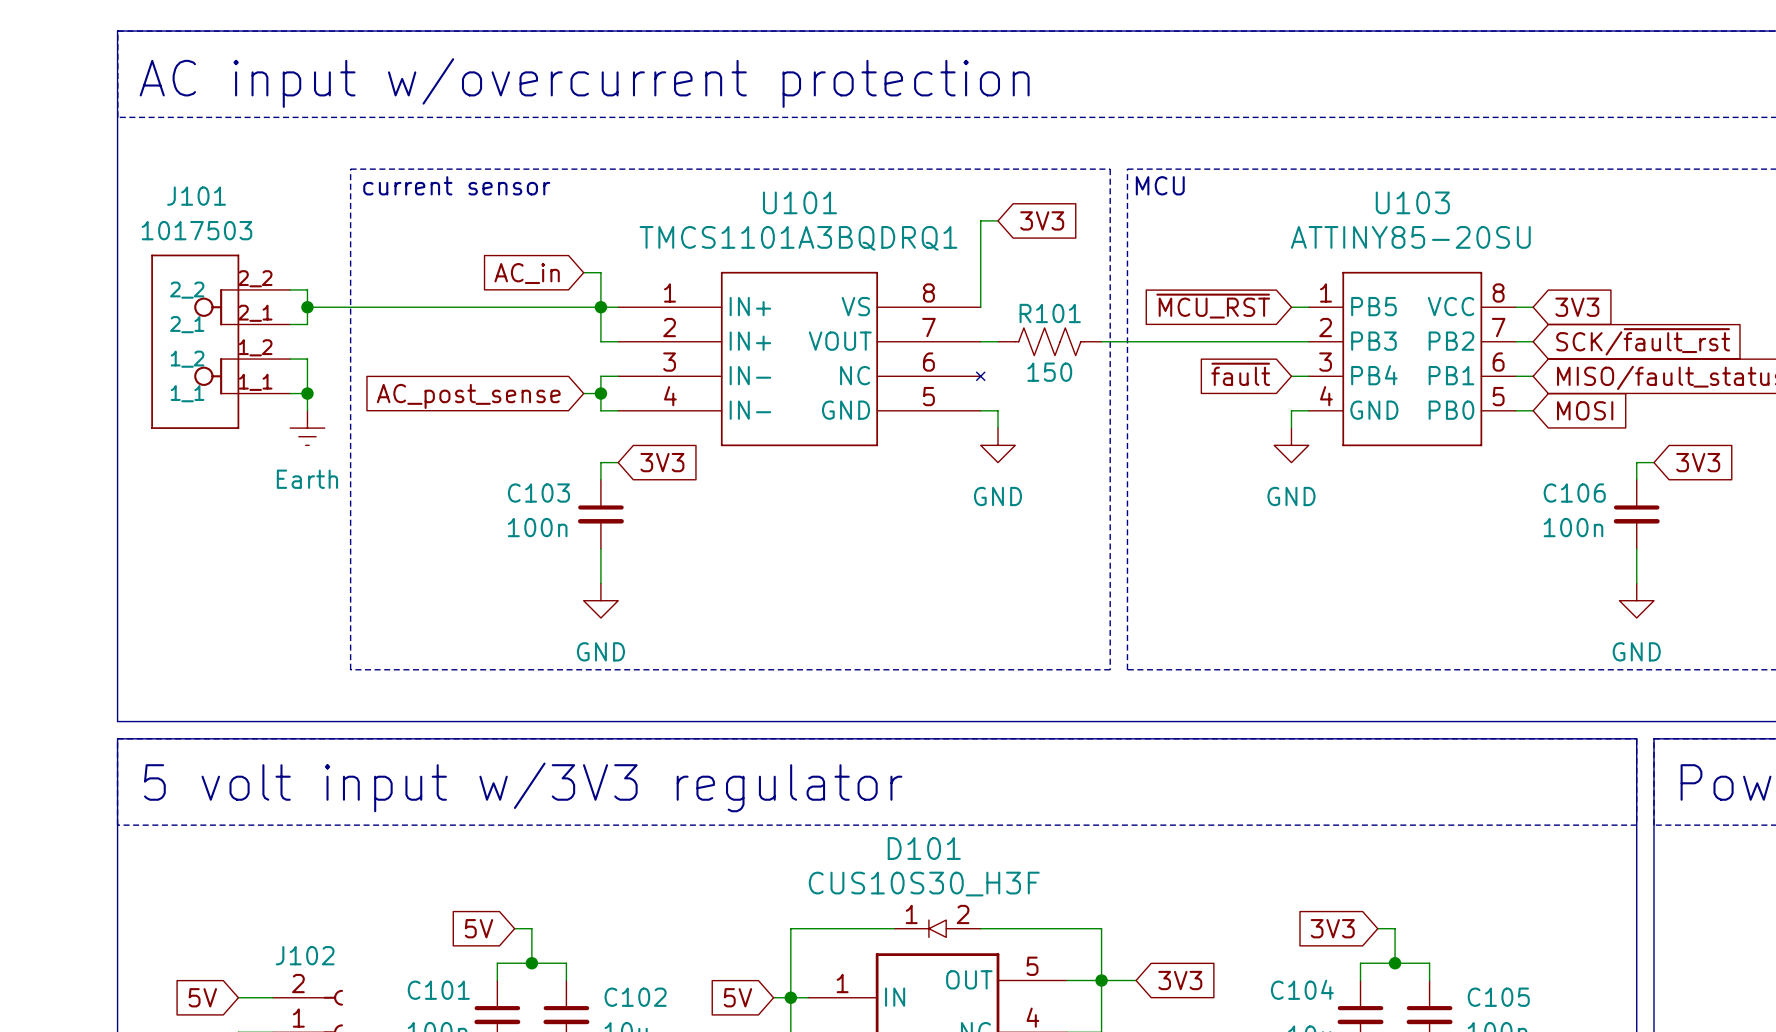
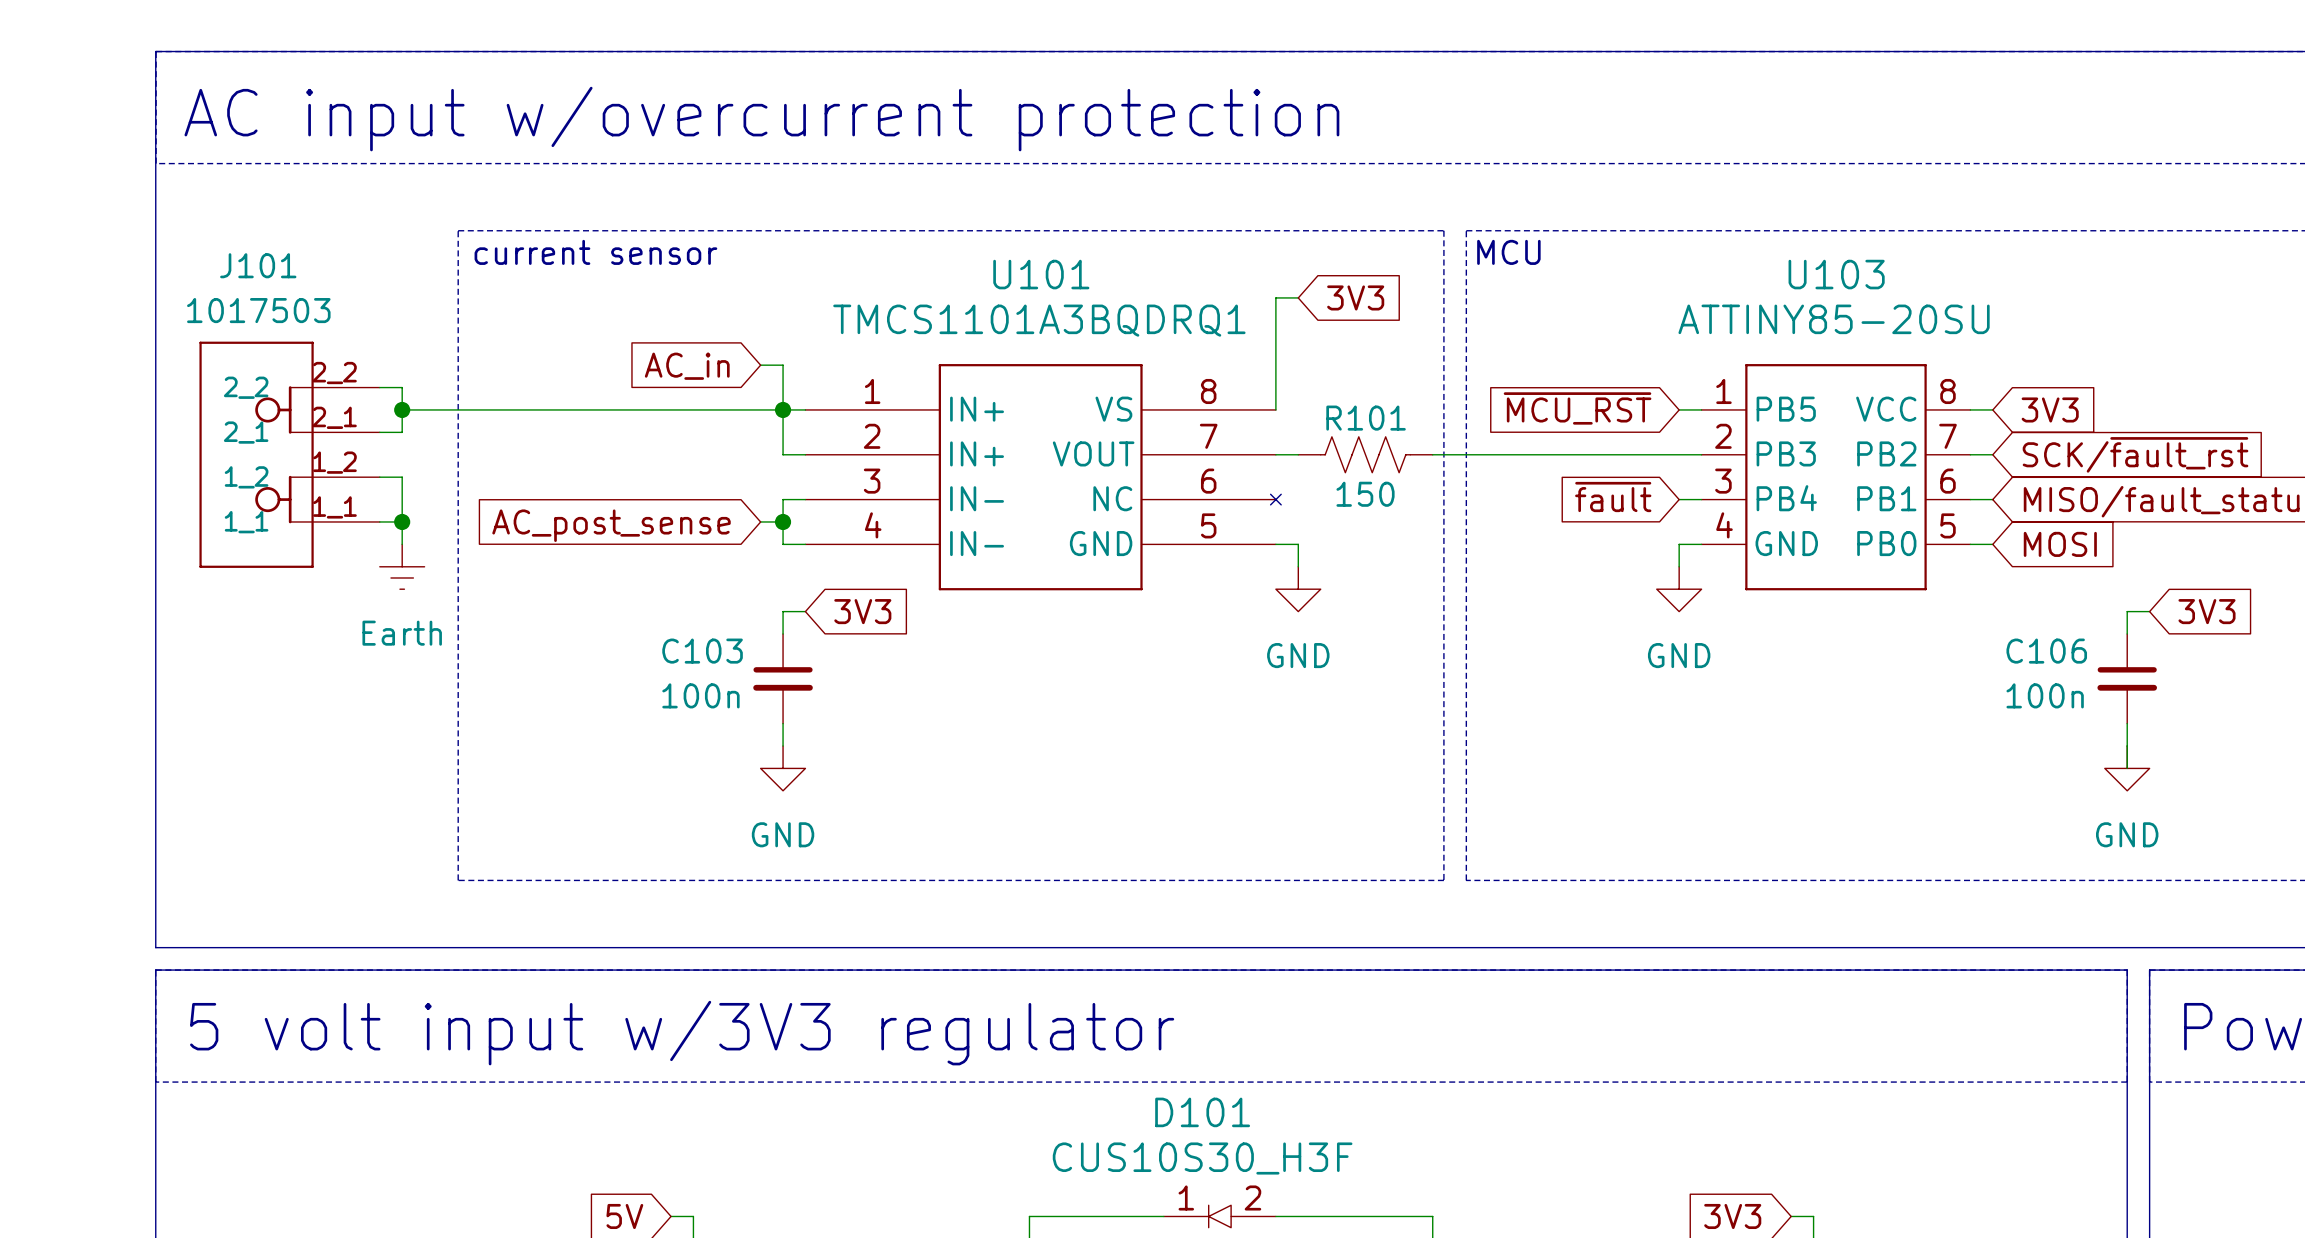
power symbol position: GND (600, 600) -> GND (783, 768)
power symbol position: GND (1636, 600) -> GND (2127, 768)

